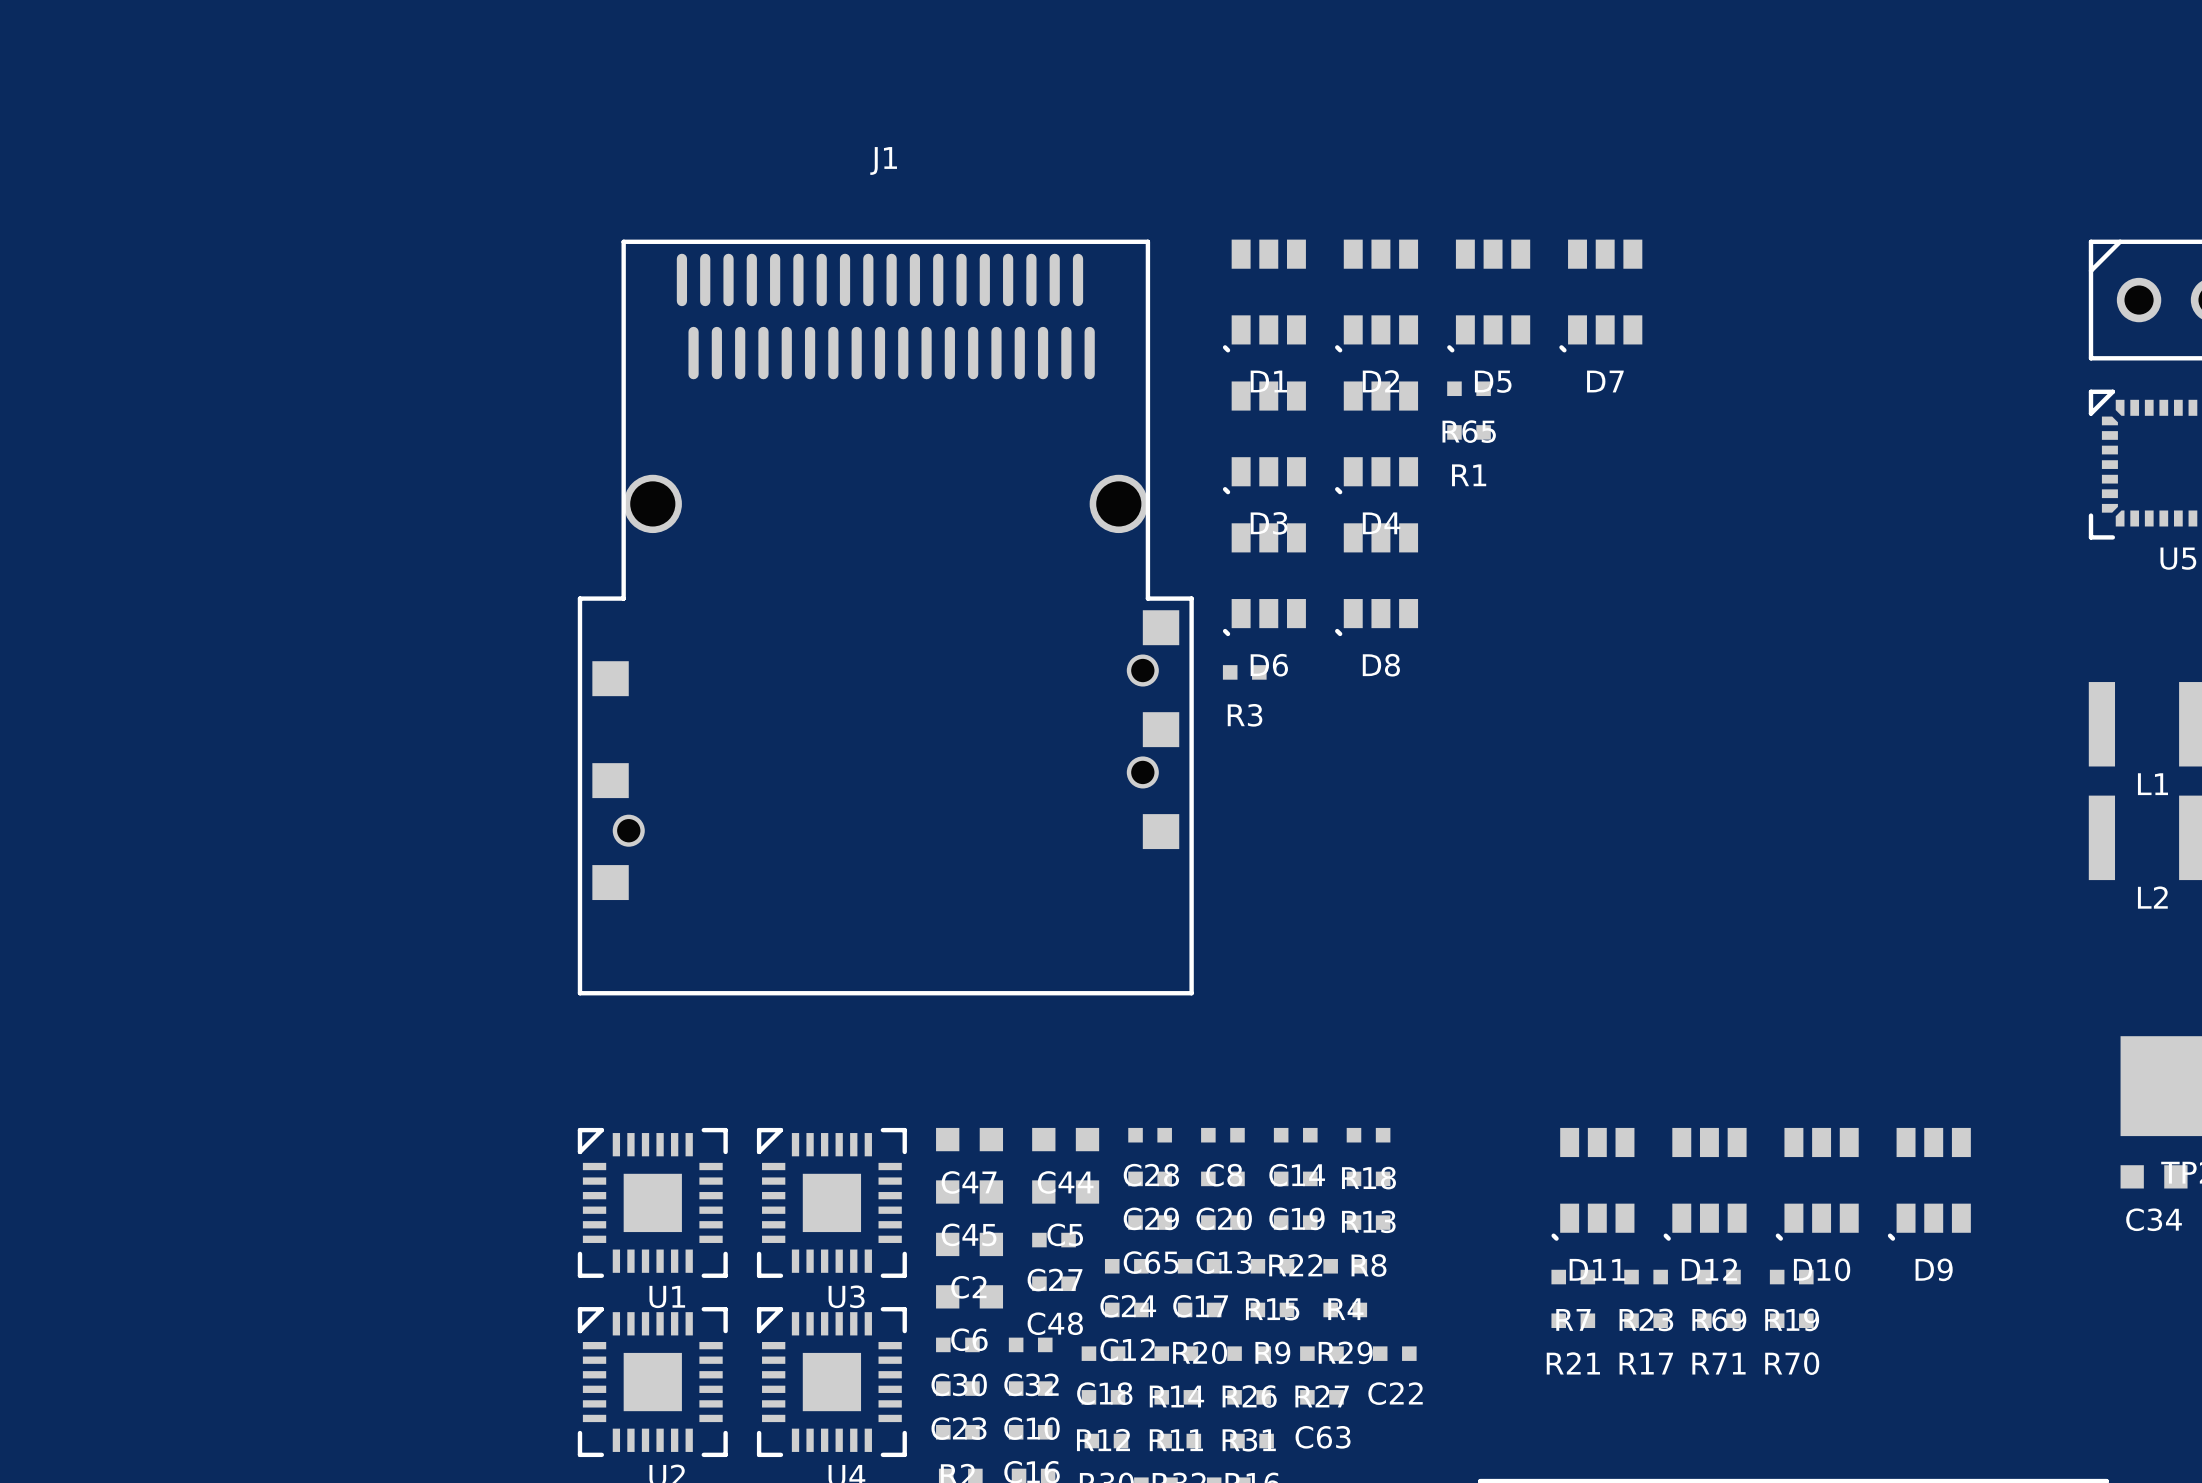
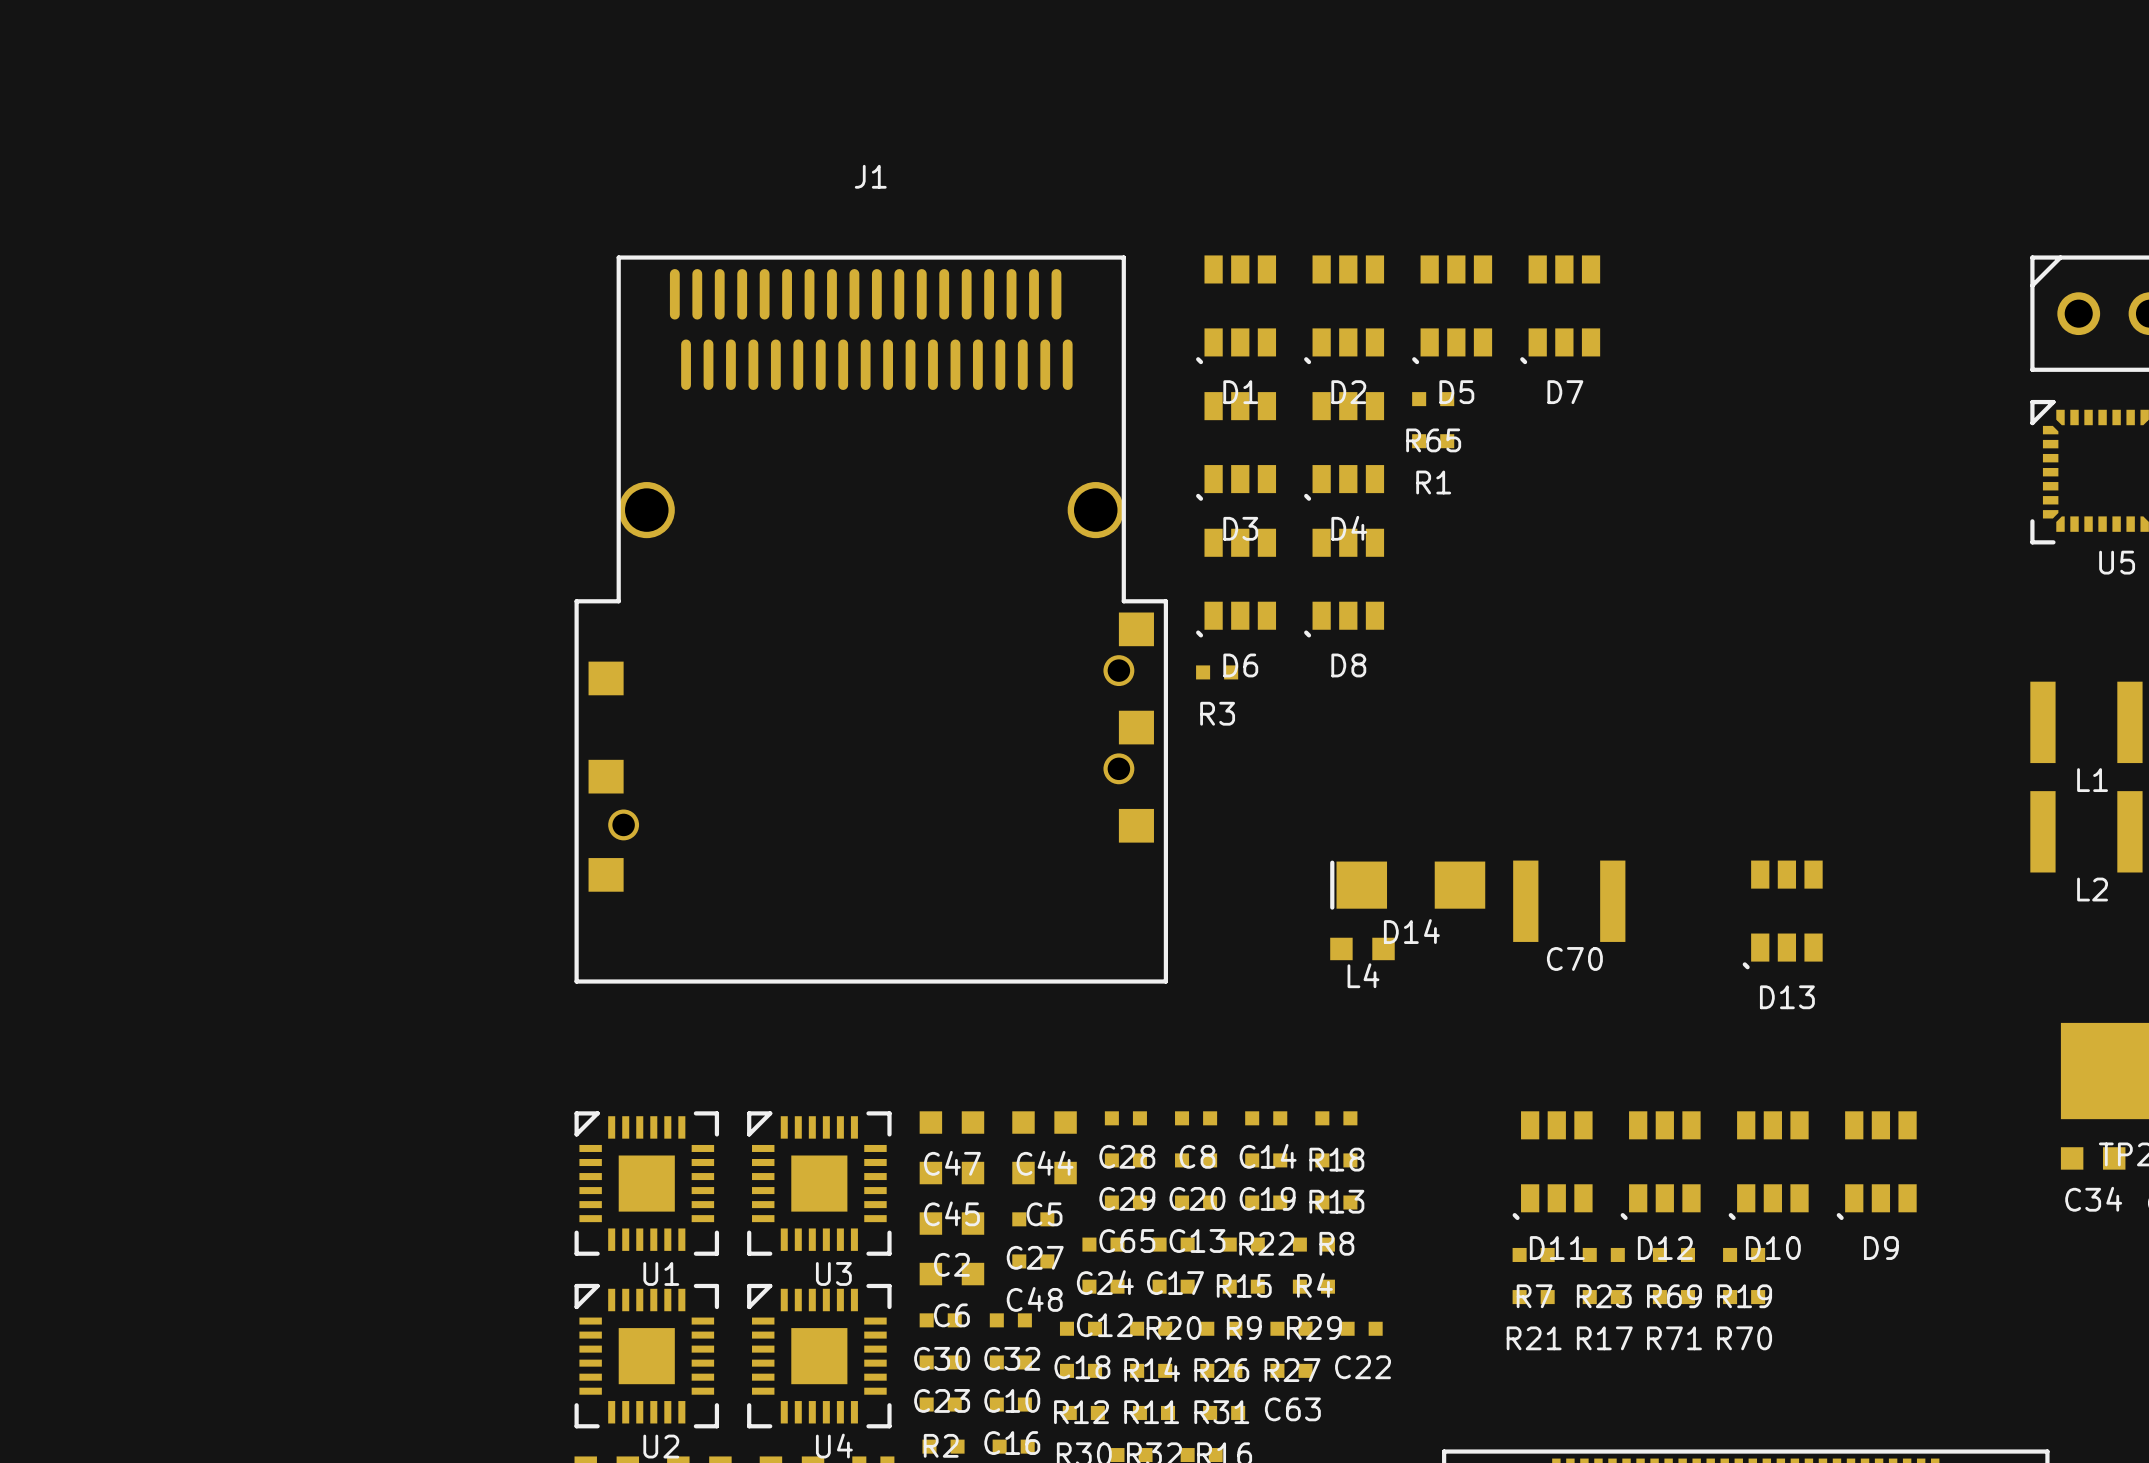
D14: none -> (1407, 885)
C70: none -> (1569, 901)
D13: none -> (1782, 914)
L4: none -> (1362, 948)

